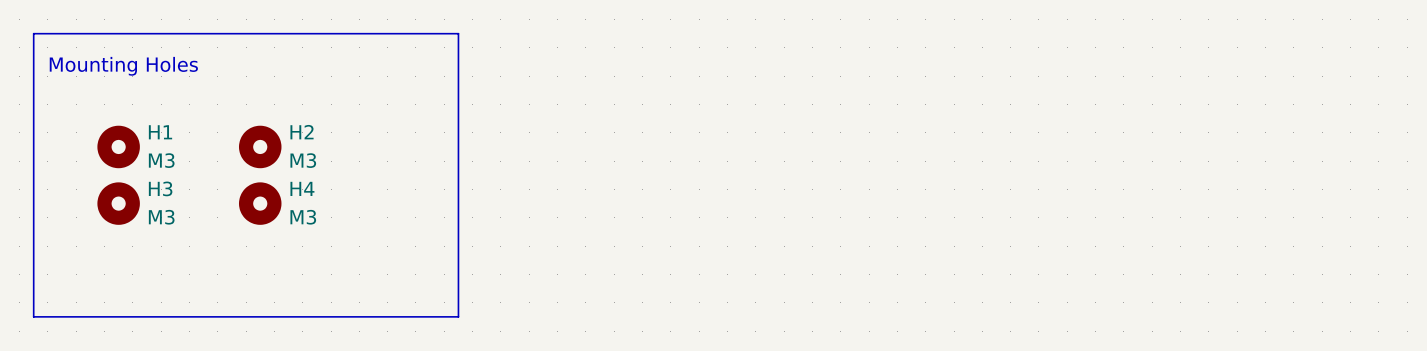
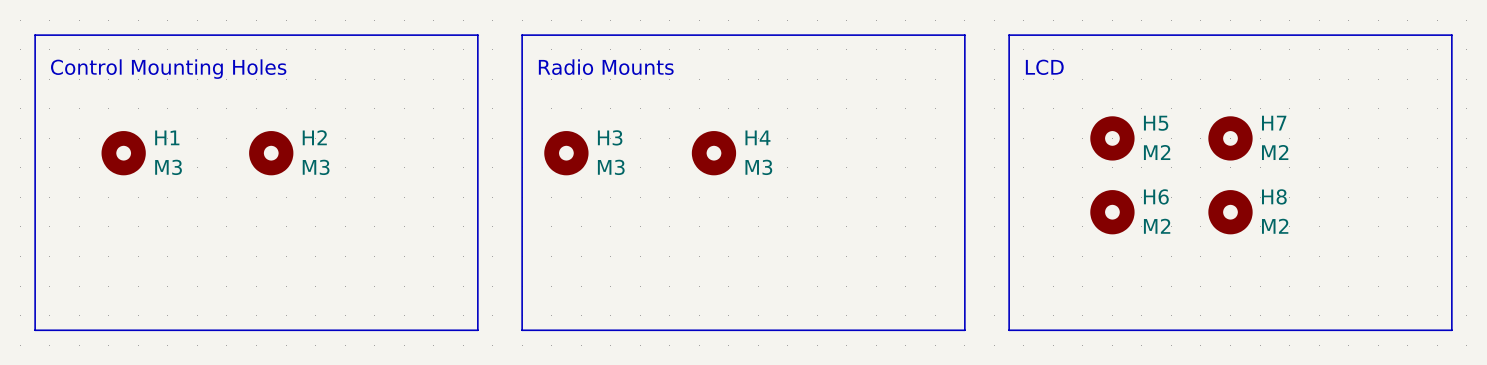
line: none -> (522, 35) (964, 35) (964, 330) (522, 330) (522, 35)
line: none -> (1009, 35) (1451, 35) (1451, 330) (1009, 330) (1009, 35)
text: none -> Radio Mounts (606, 67)
text: none -> LCD (1044, 67)
text: Mounting Holes (123, 66) -> Control Mounting Holes (168, 69)
H5: none -> M2 (1112, 138)
H7: none -> M2 (1230, 138)
H3 position: (118, 203) -> (566, 153)
H4 position: (260, 203) -> (713, 153)
H6: none -> M2 (1112, 212)
H8: none -> M2 (1230, 212)

